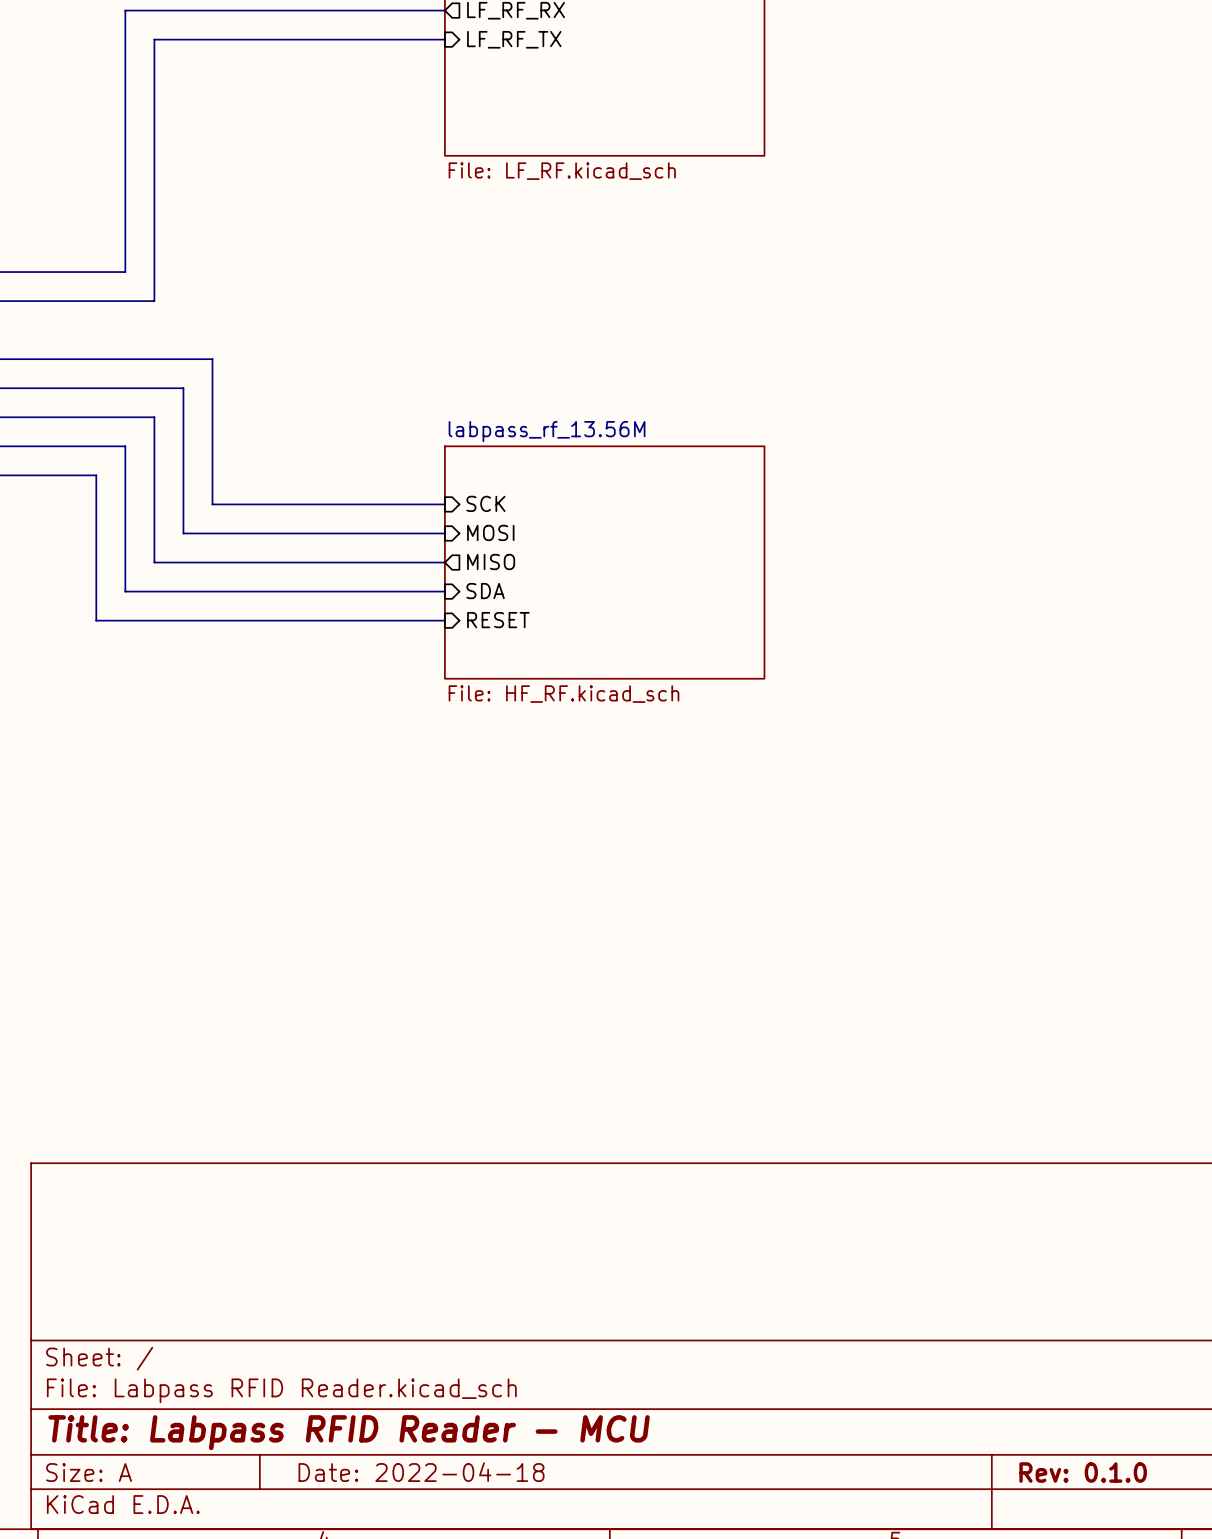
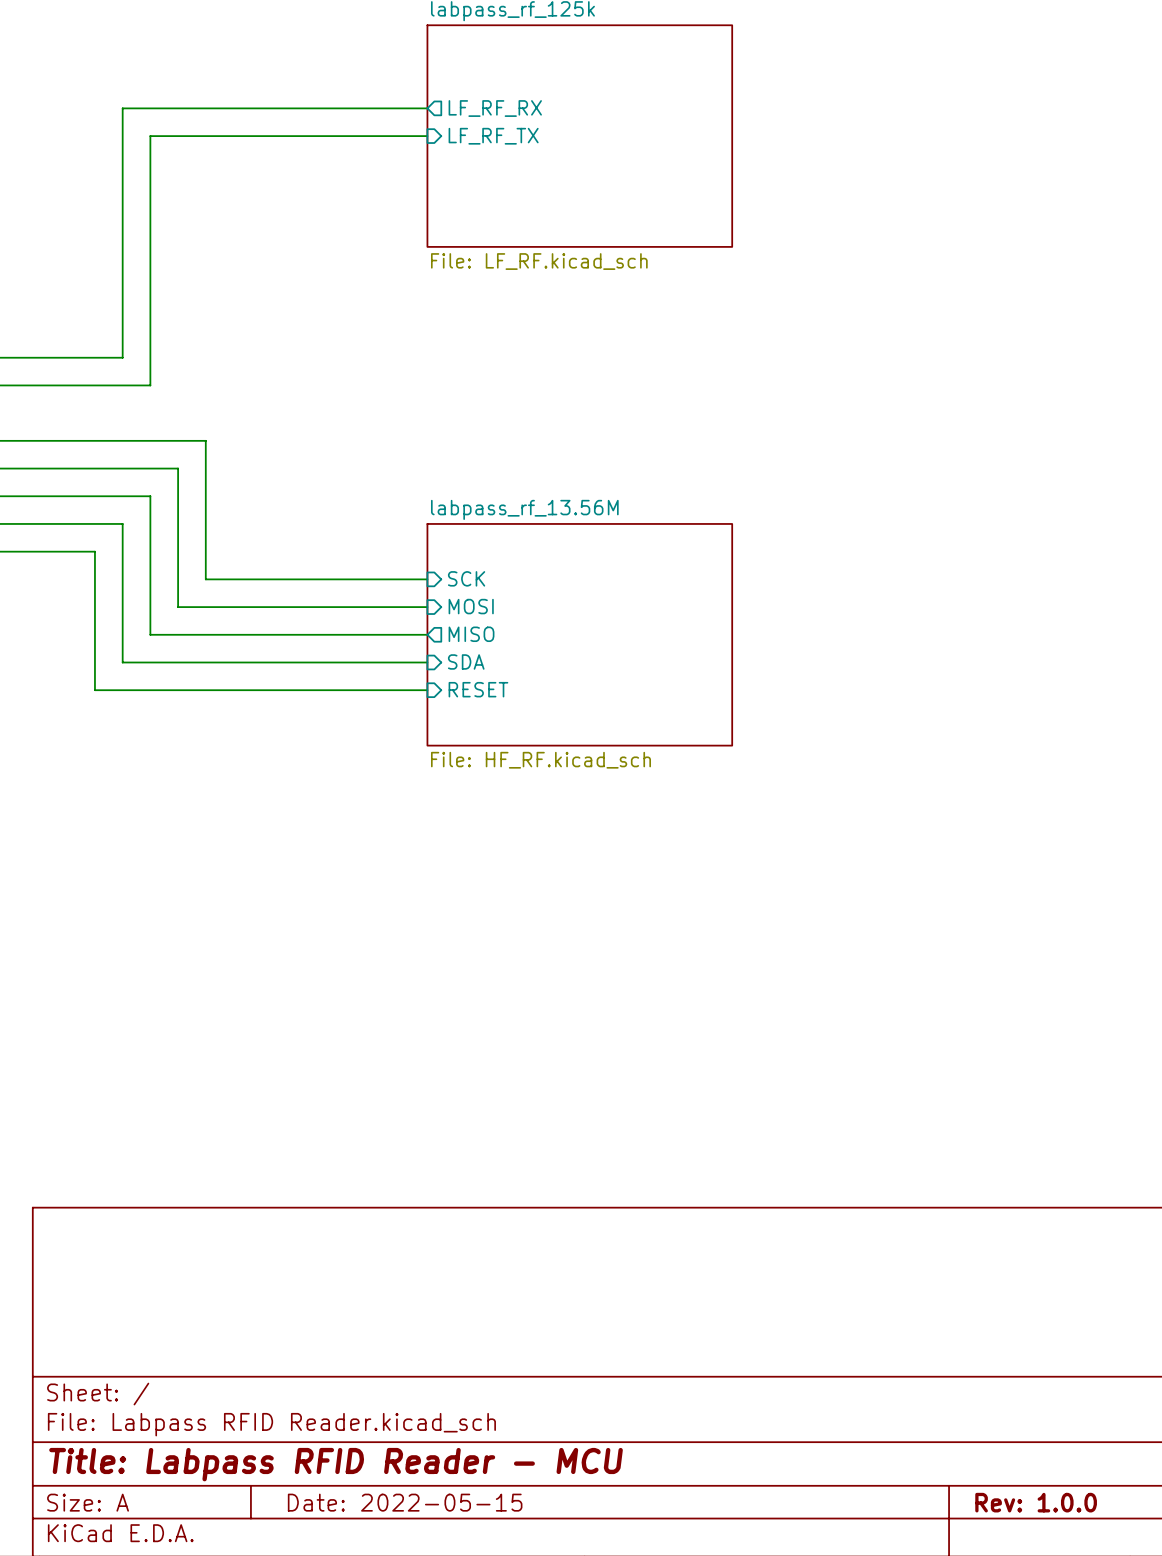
title block: Date: 2022-04-18 (421, 1472) -> Date: 2022-05-15 (405, 1502)
title block: Rev: 0.1.0 (1083, 1472) -> Rev: 1.0.0 (1036, 1502)

